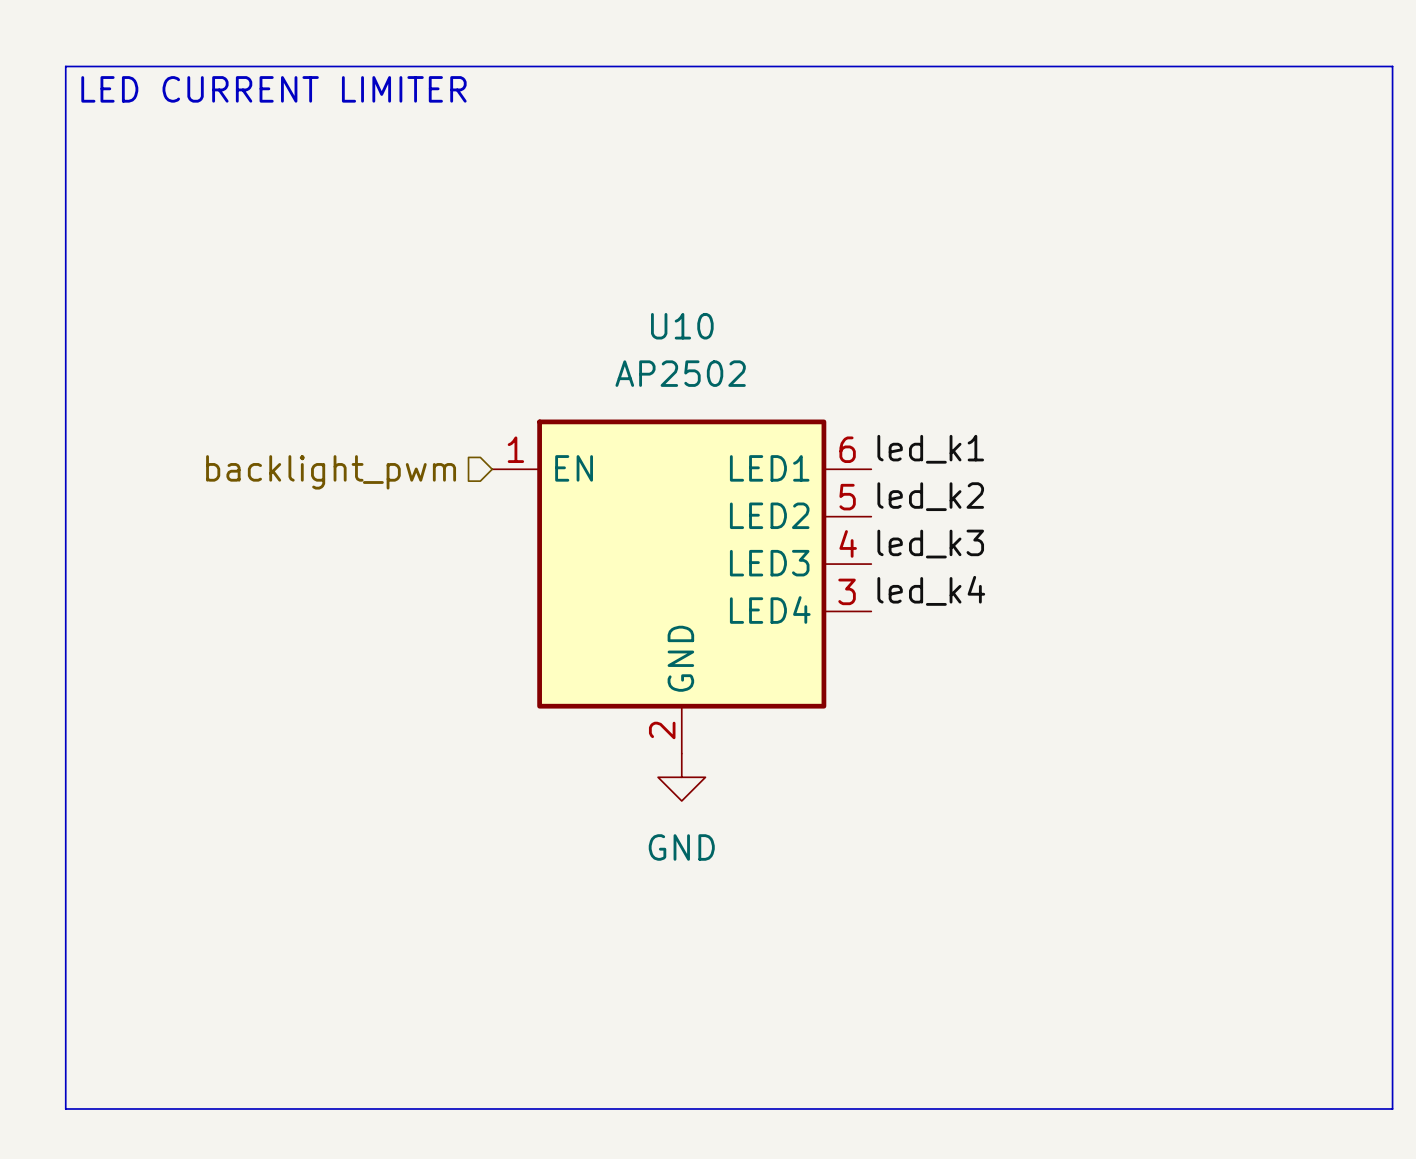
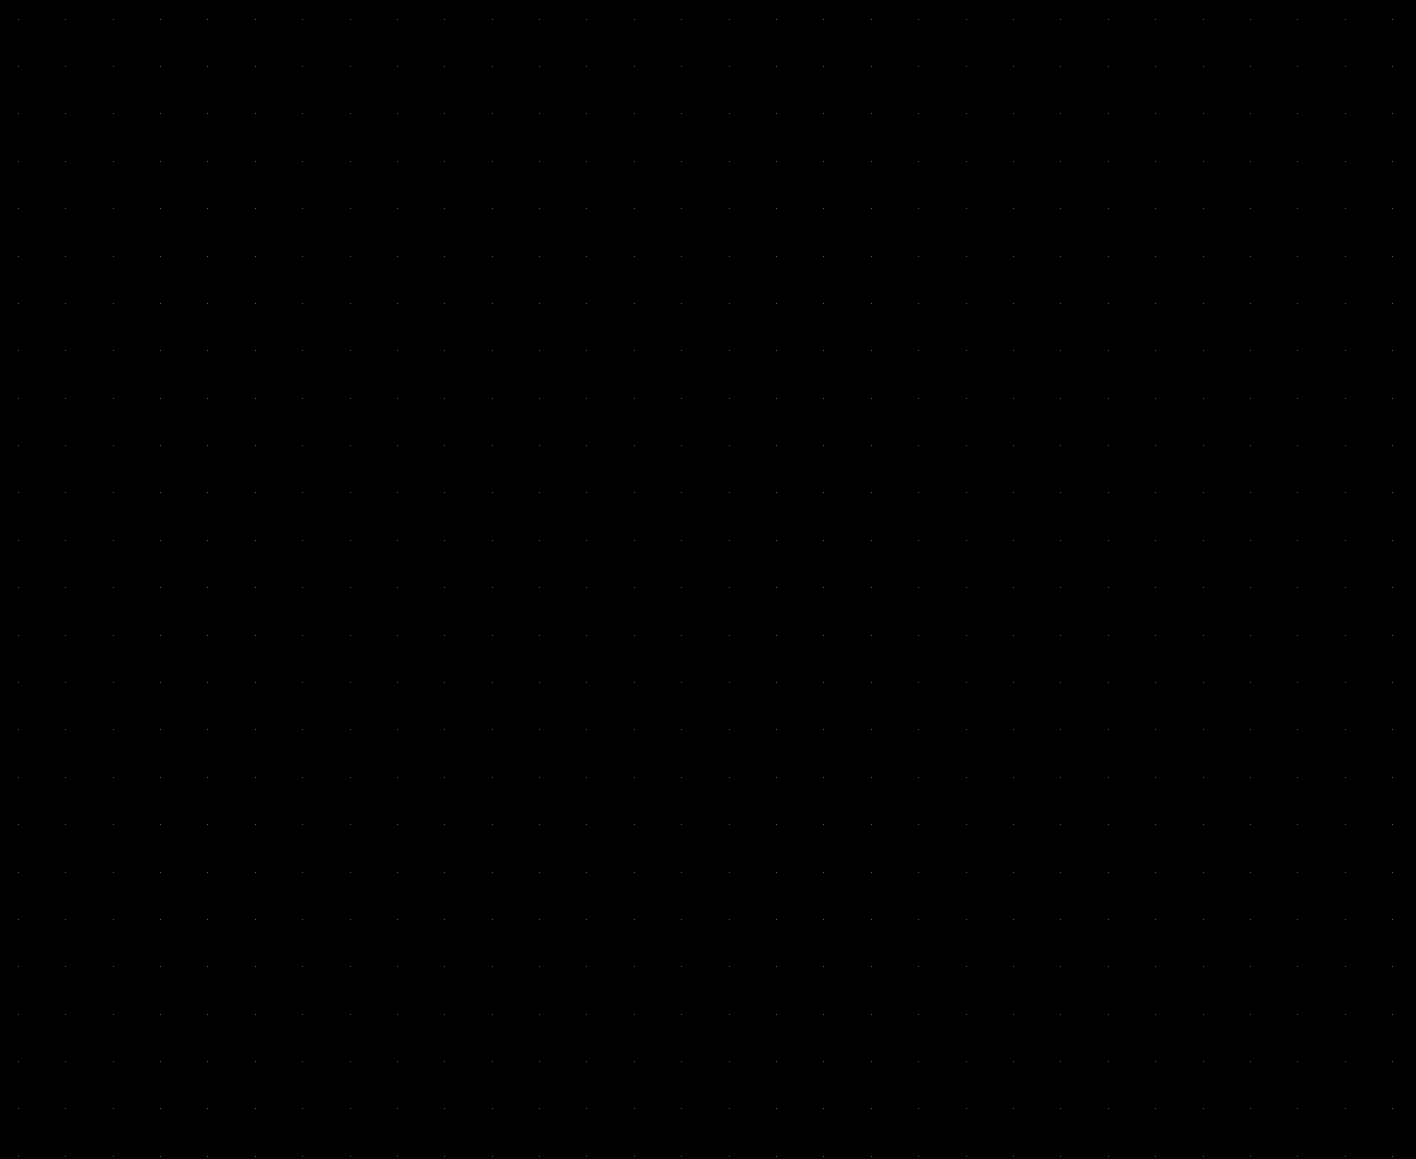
line: (65, 66) (1392, 66) (1392, 1108) (65, 1108) (65, 66) -> none
text: LED CURRENT LIMITER (273, 89) -> none
label: led_k1 (930, 449) -> none
hierarchical label: backlight_pwm (331, 472) -> none
label: led_k2 (930, 496) -> none
label: led_k3 (930, 544) -> none
U10: AP2502 (681, 586) -> none
label: led_k4 (931, 590) -> none
power symbol: GND (681, 777) -> none

